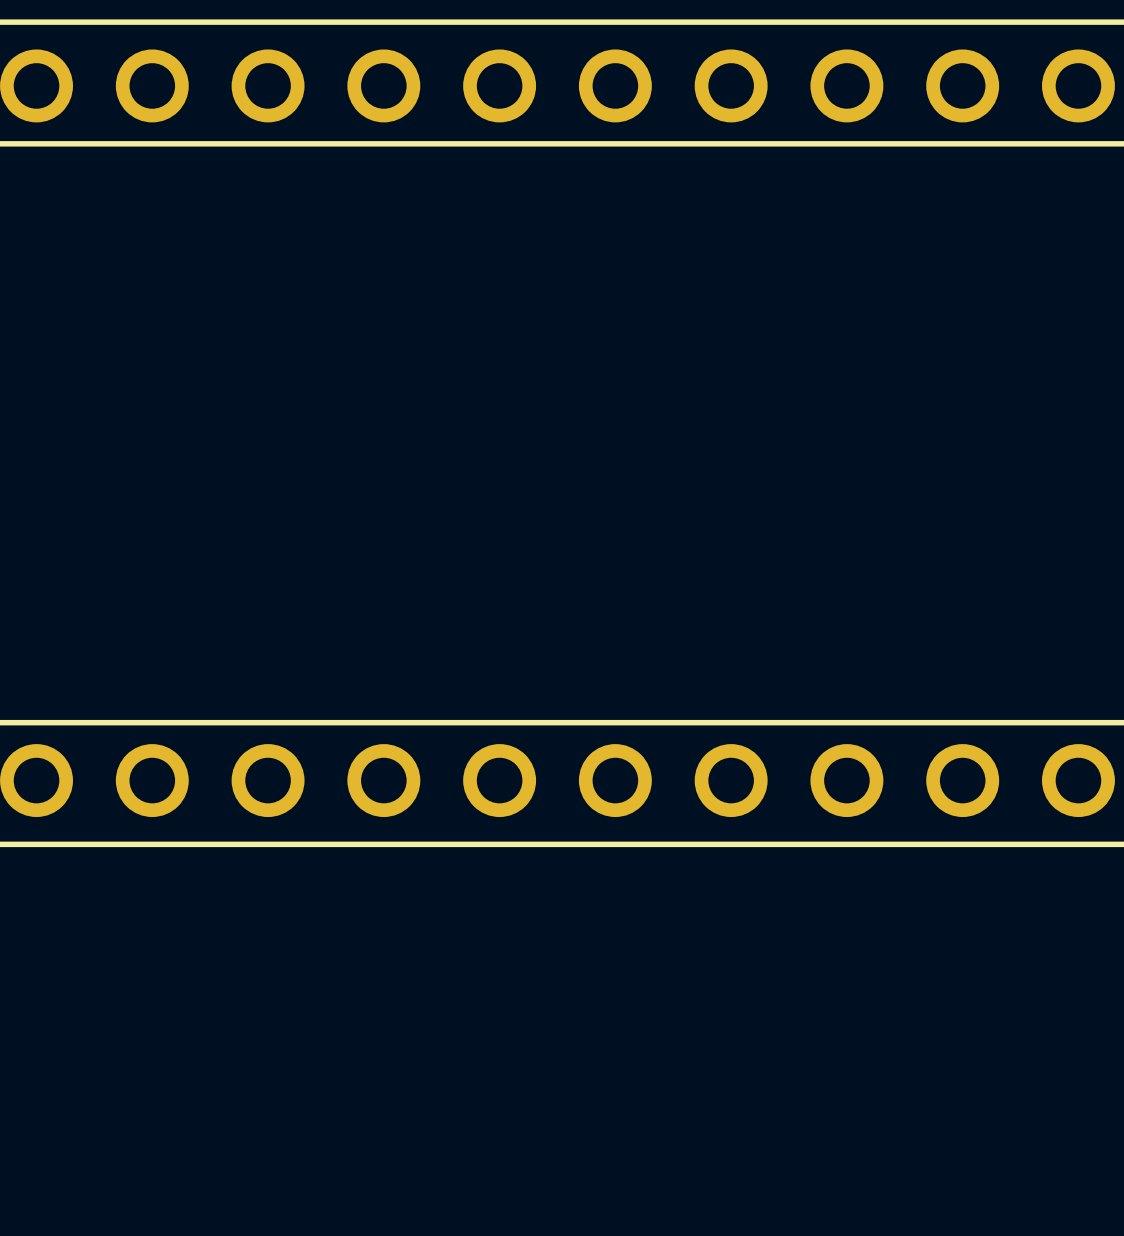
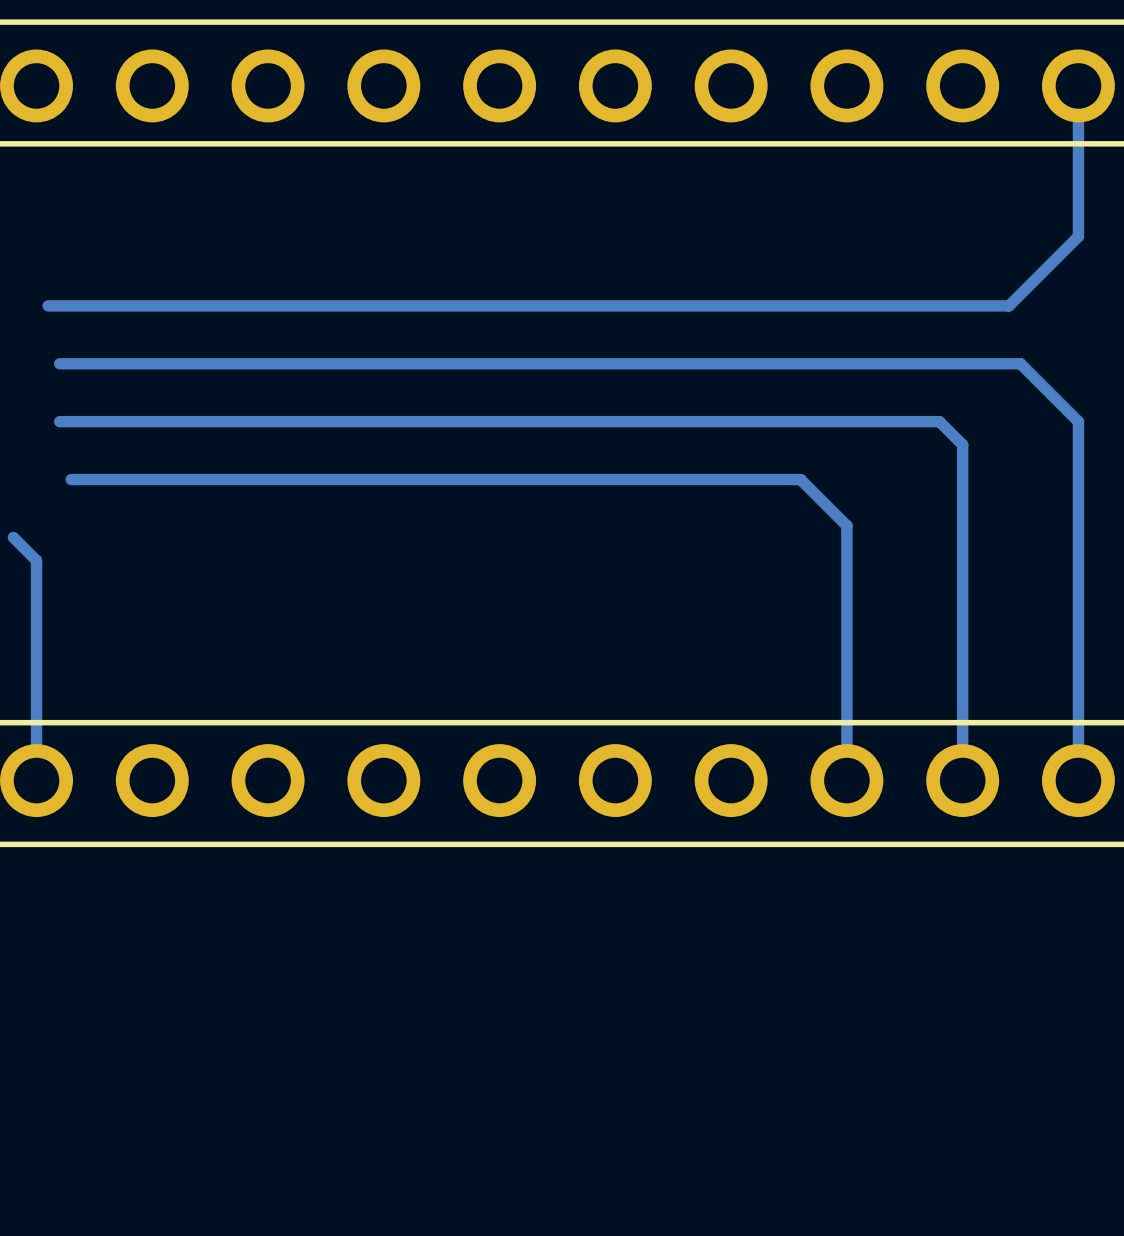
track: none -> (1078, 85) (1078, 236) (1008, 305) (48, 305)
track: none -> (59, 363) (1020, 363) (1078, 421) (1078, 780)
track: none -> (59, 421) (939, 421) (962, 444) (962, 780)
track: none -> (71, 479) (800, 479) (846, 525) (846, 780)
track: none -> (13, 537) (36, 560) (36, 780)

